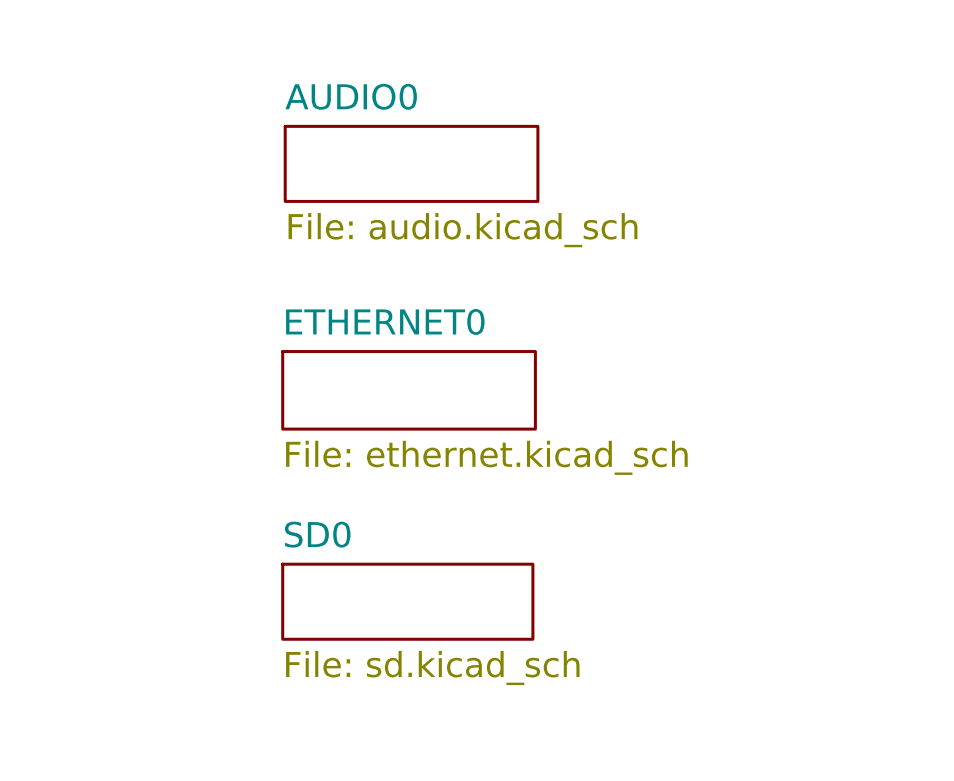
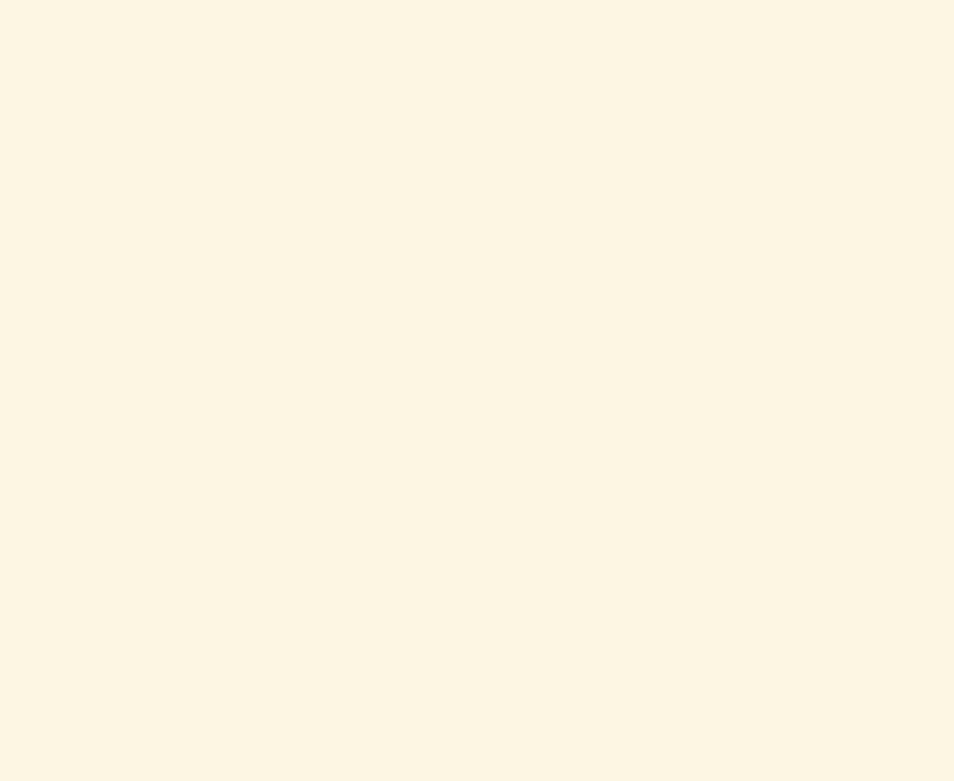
sheet AUDIO0: File: audio.kicad_sch (411, 163) -> none
sheet ETHERNET0: File: ethernet.kicad_sch (409, 390) -> none
sheet SD0: File: sd.kicad_sch (407, 601) -> none

